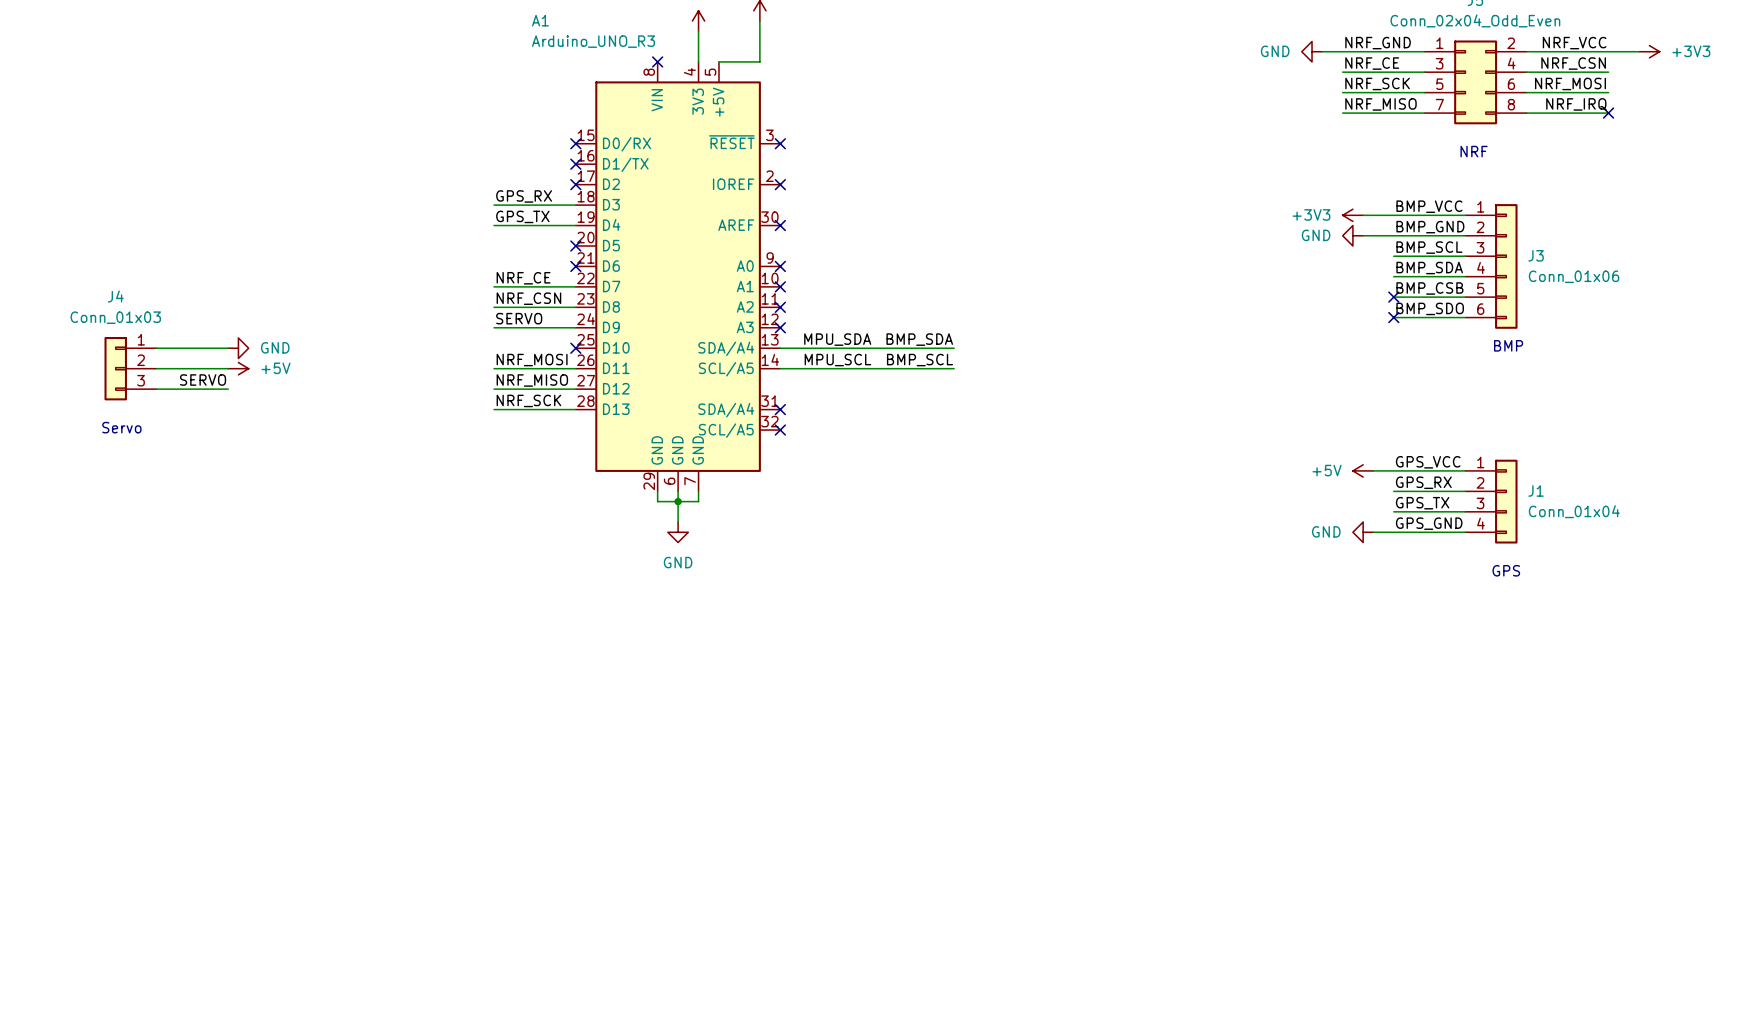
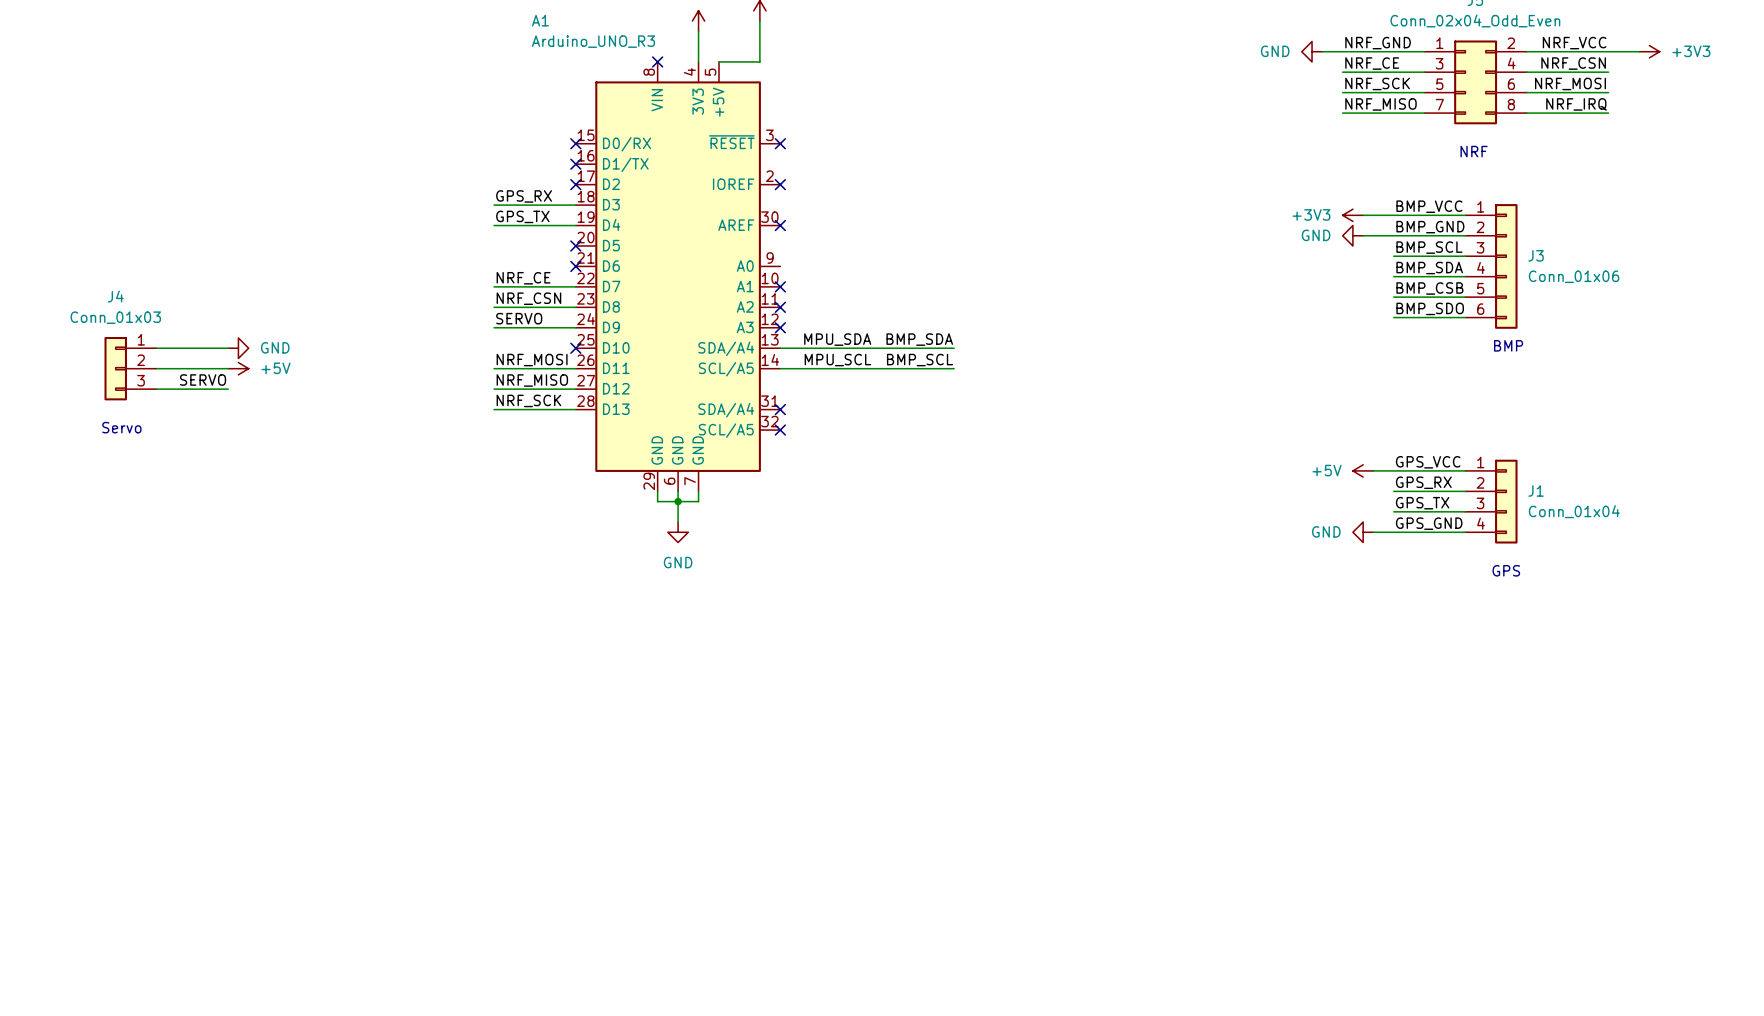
no-connect mark: (1608, 113) -> none
no-connect mark: (780, 266) -> none
no-connect mark: (1393, 297) -> none
no-connect mark: (1393, 317) -> none

